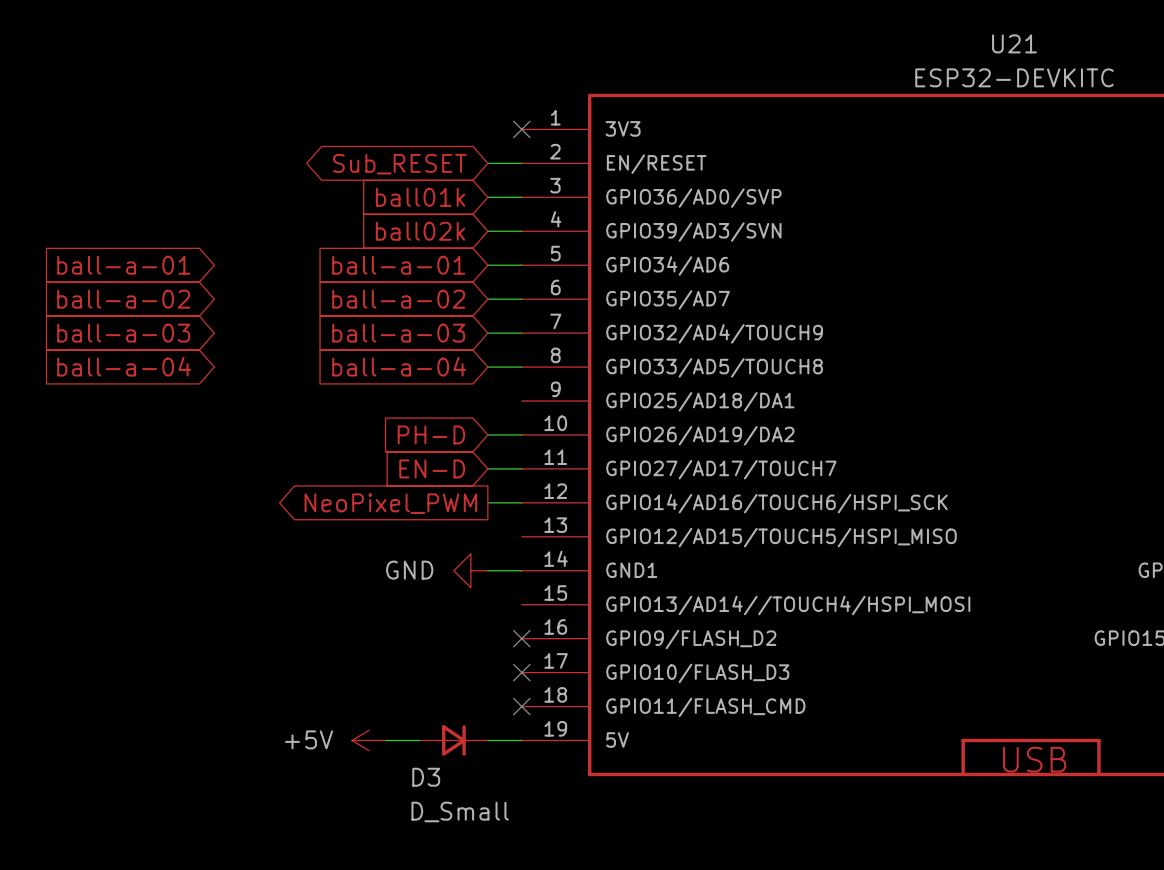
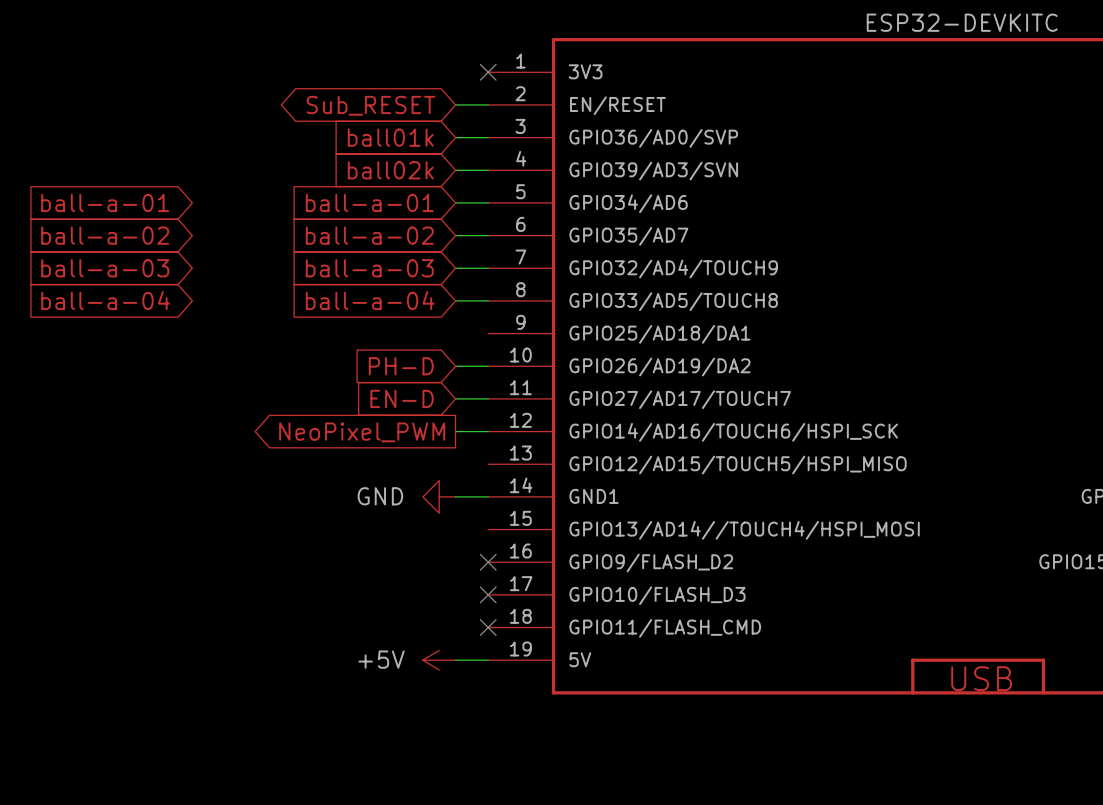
power symbol position: +5V (369, 740) -> +5V (439, 660)
wire: (386, 740) (419, 740) -> none
D3: D_Small (453, 740) -> none

